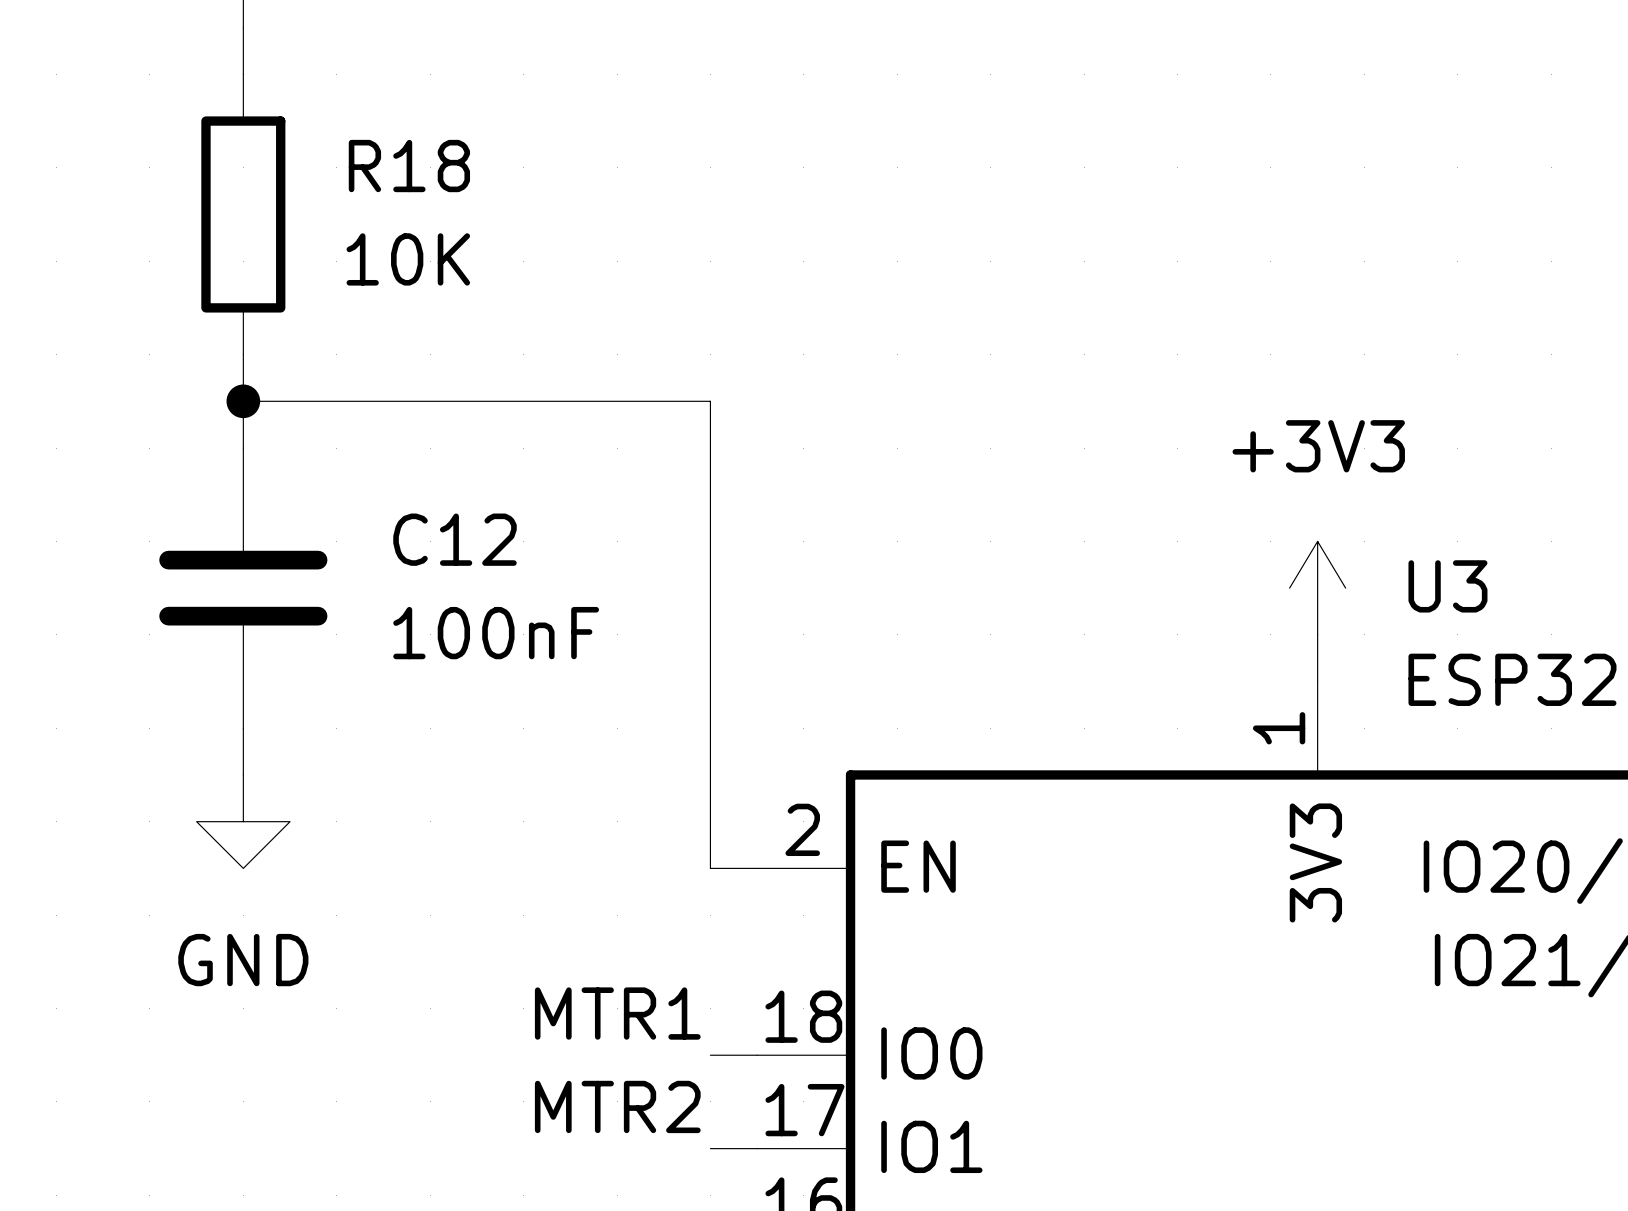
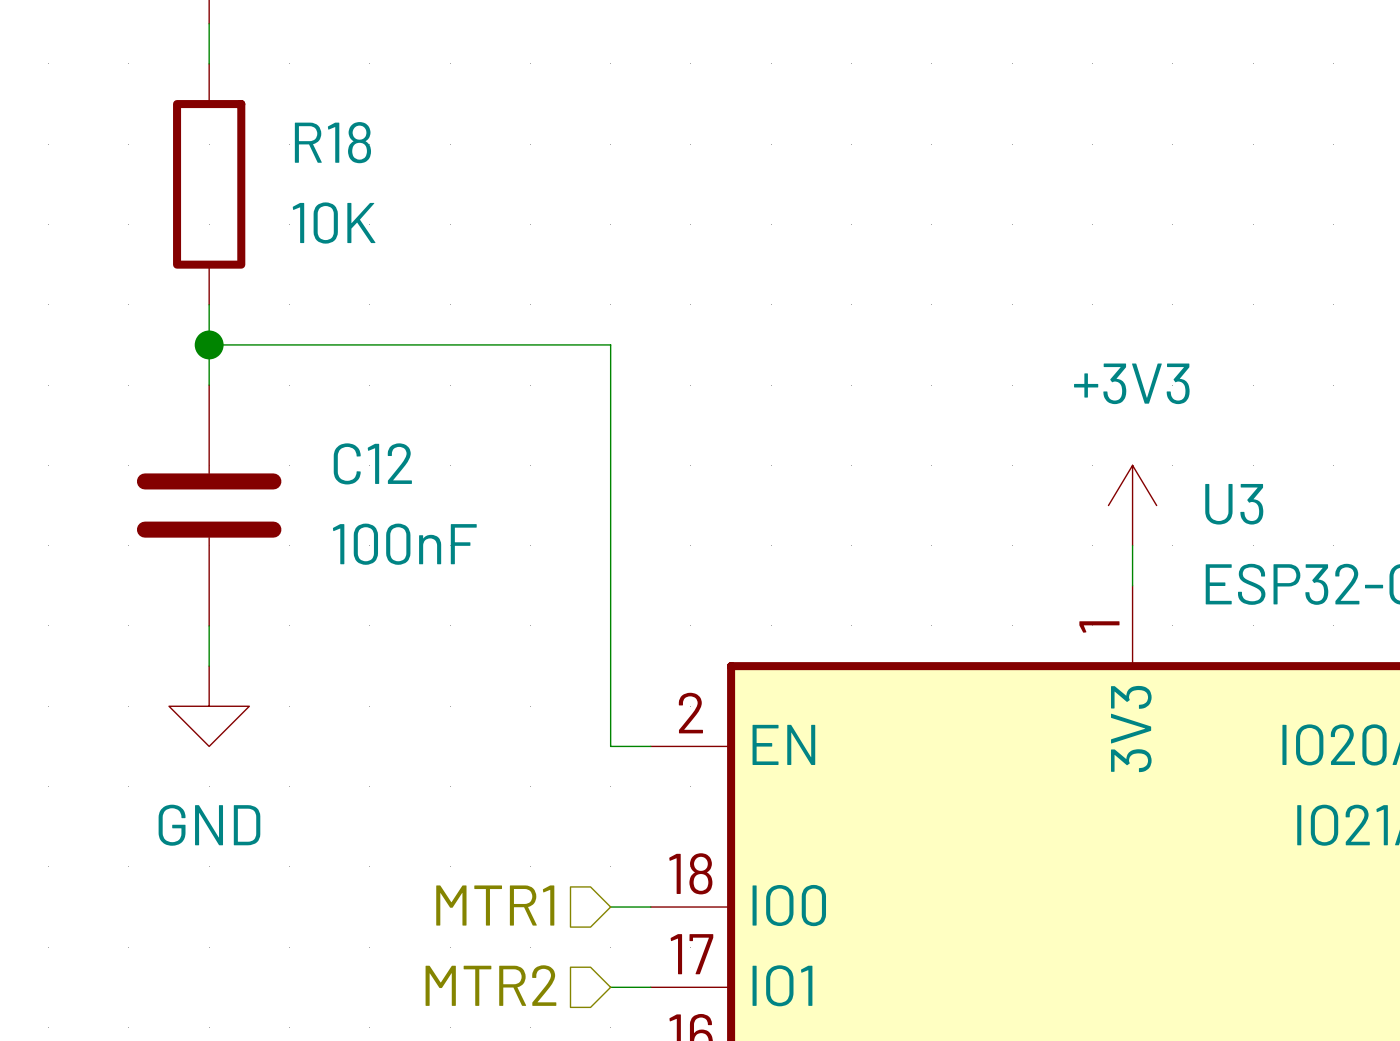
label: MTR1 (617, 1013) -> none
hierarchical label: none -> MTR1 (495, 905)
label: MTR2 (617, 1106) -> none
hierarchical label: none -> MTR2 (490, 985)

